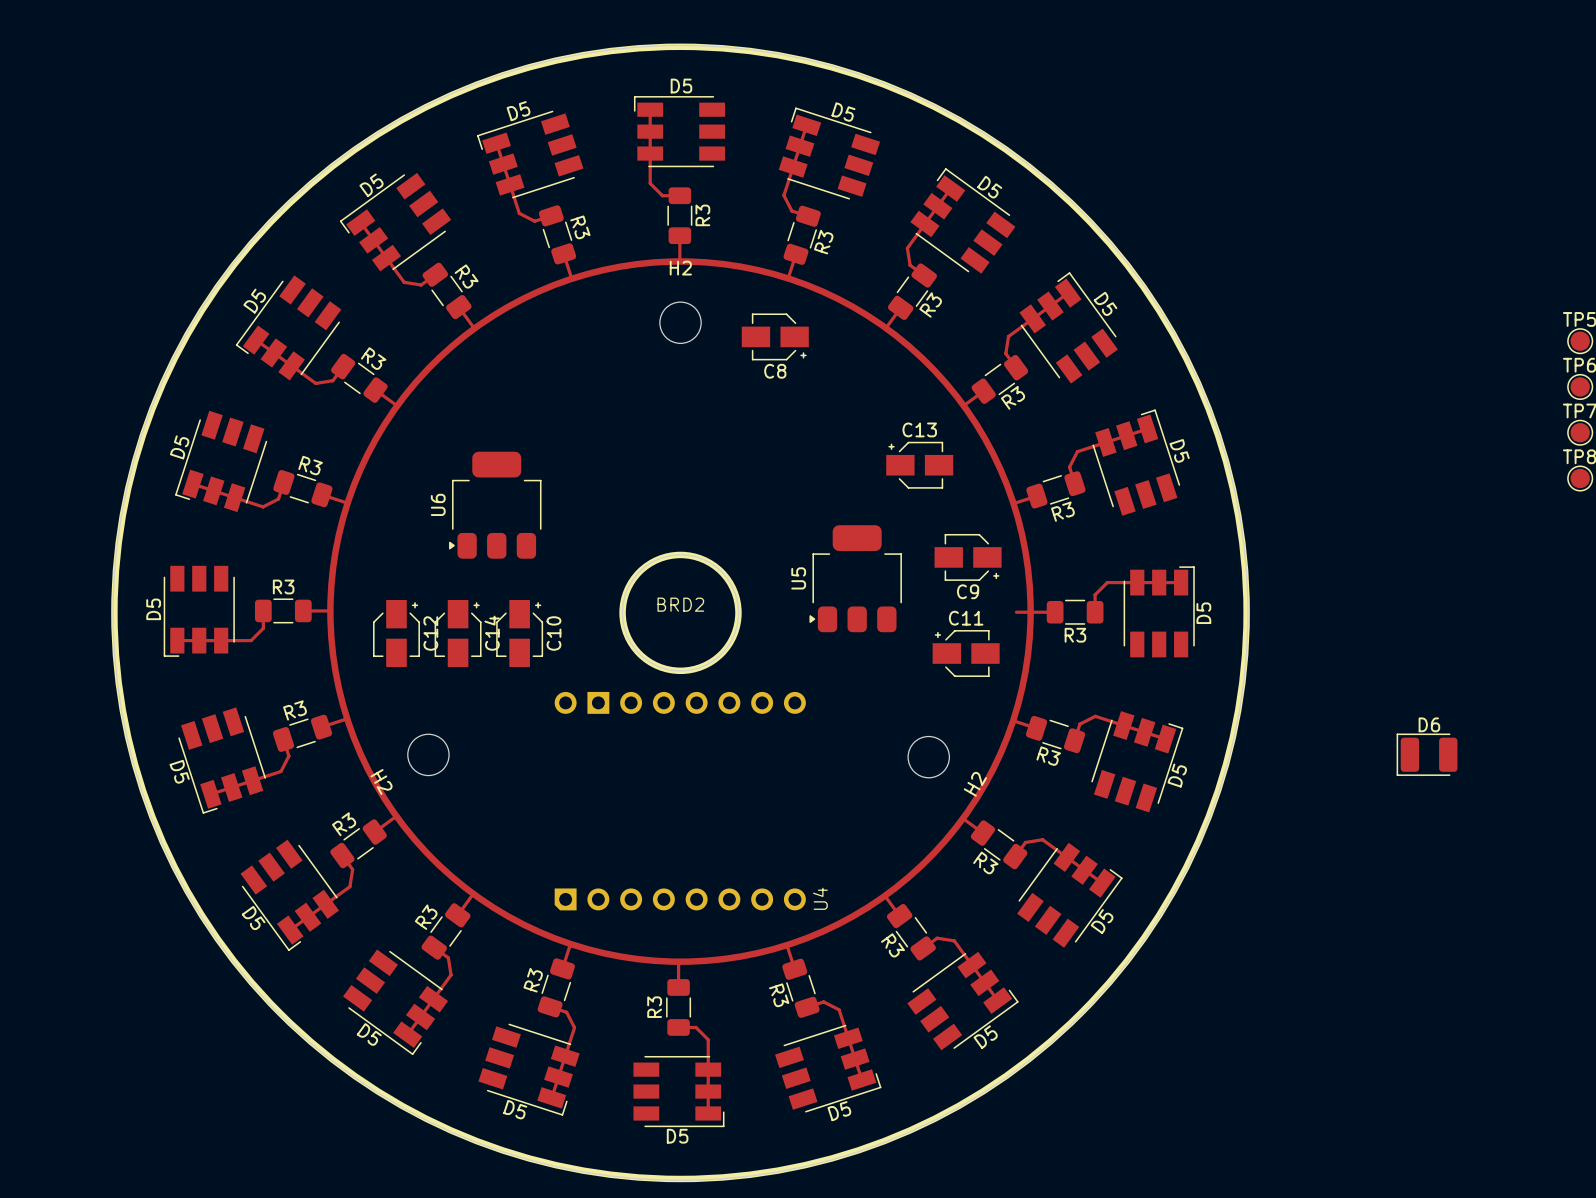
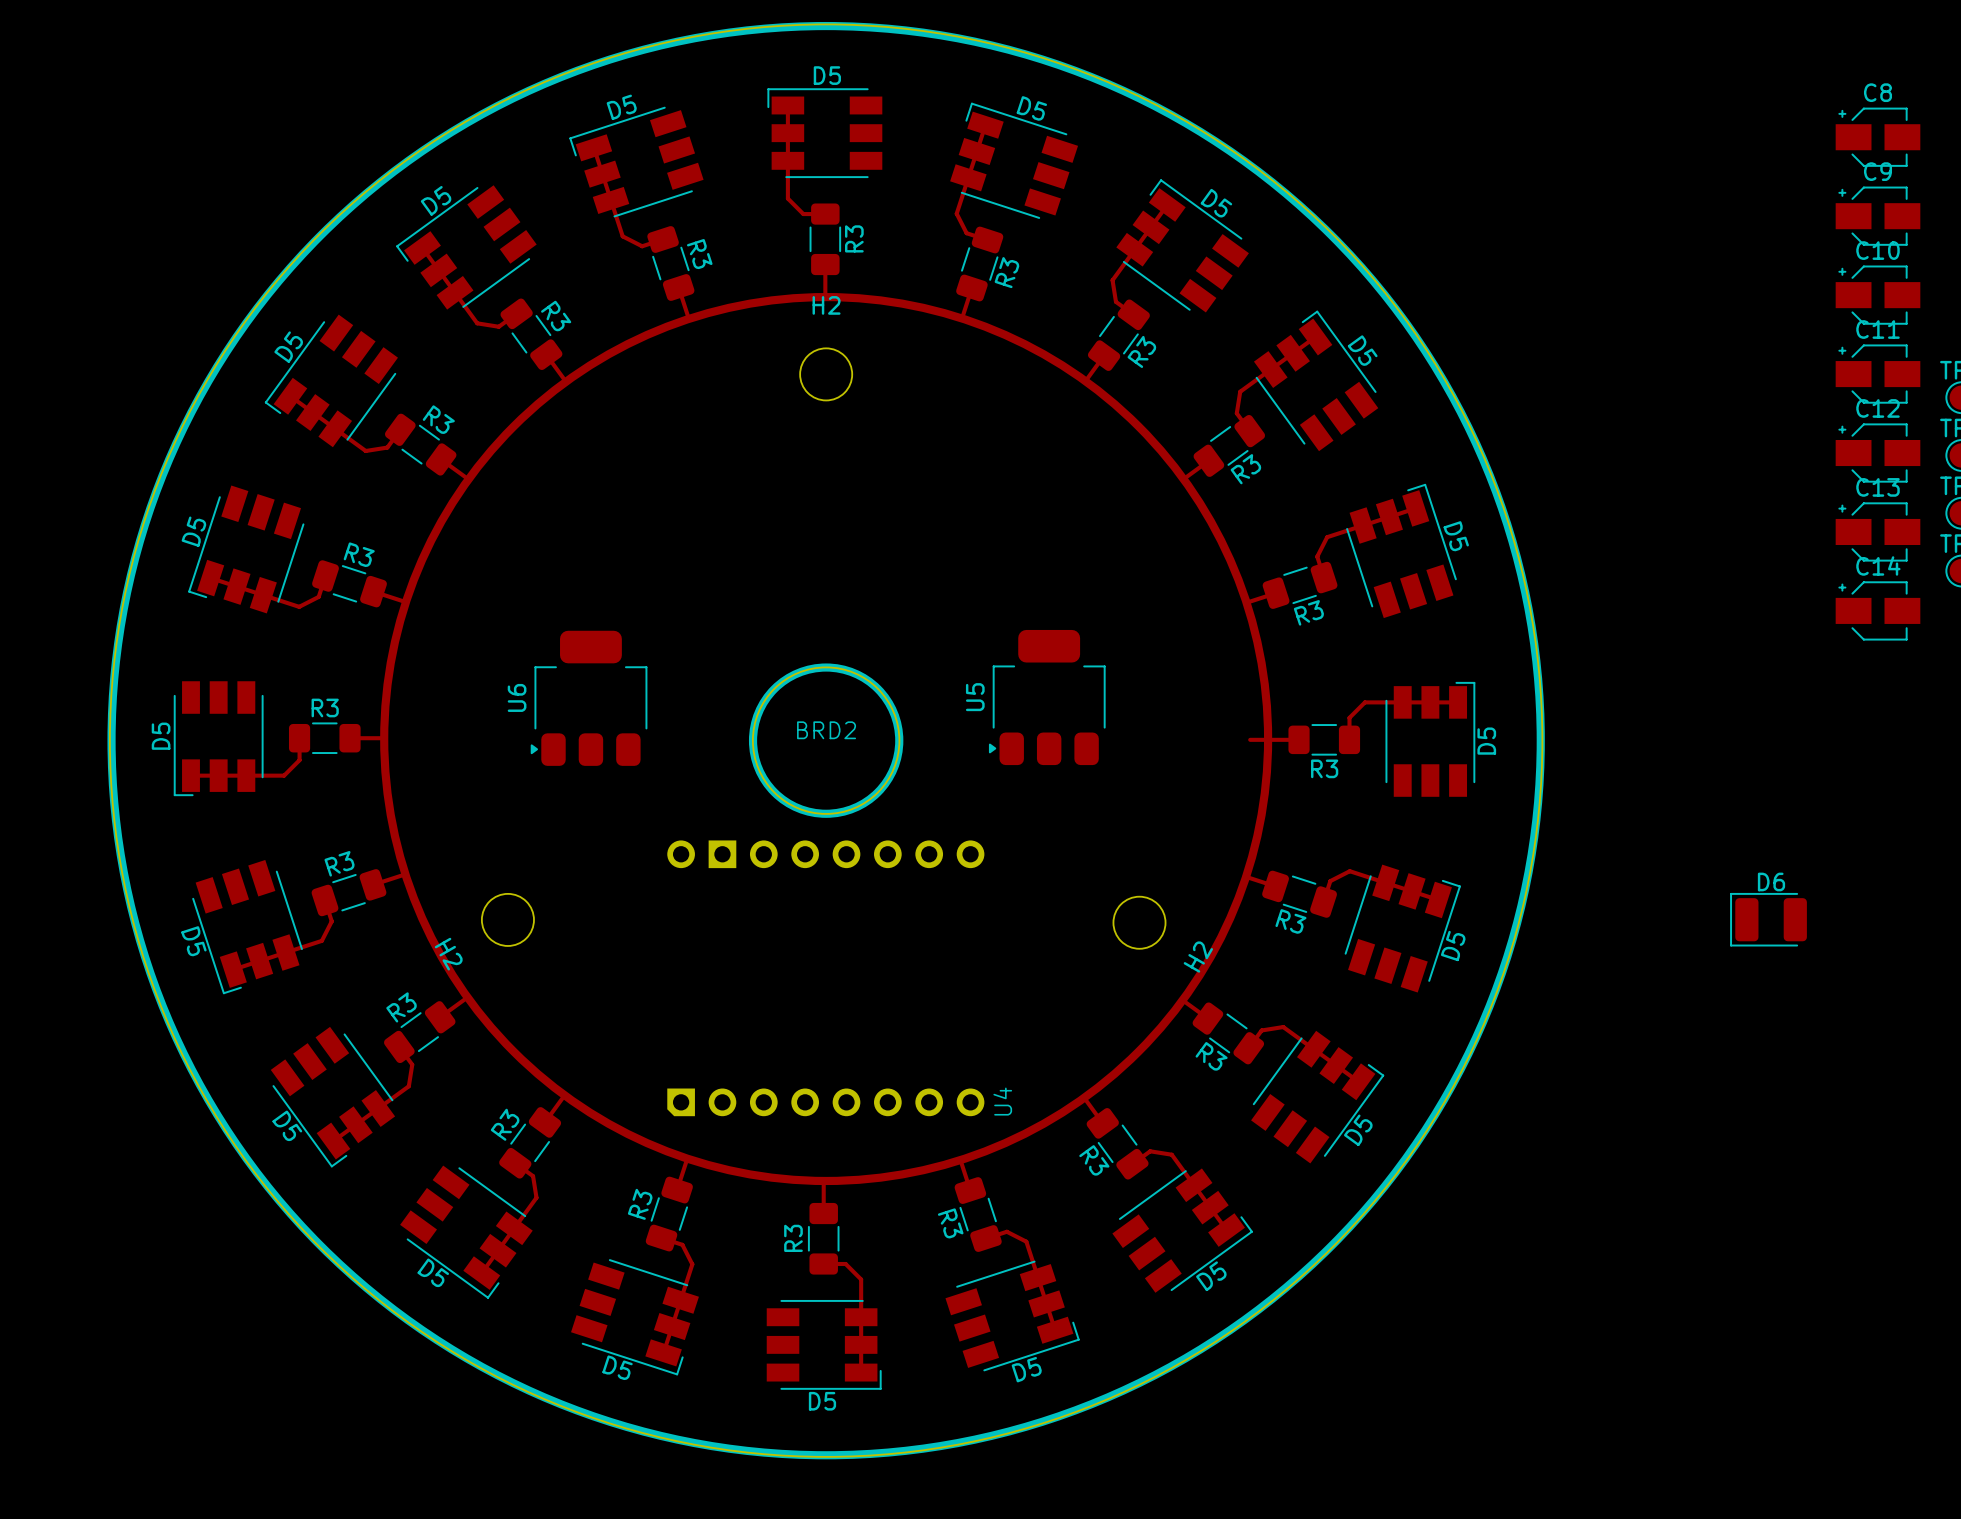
C8 rotation: 0° (775, 336) -> 180° (1878, 137)
C8 position: (775, 336) -> (1878, 137)
C13 position: (919, 465) -> (1878, 531)
U6 position: (495, 505) -> (589, 698)
C9 rotation: 0° (968, 557) -> 180° (1878, 216)
C9 position: (968, 557) -> (1878, 216)
C12 rotation: 0° (396, 633) -> 90° counterclockwise (1878, 453)
C12 position: (396, 633) -> (1878, 453)
C14 rotation: 0° (458, 633) -> 90° counterclockwise (1878, 610)
C14 position: (458, 633) -> (1878, 610)
C10 rotation: 0° (519, 633) -> 90° counterclockwise (1878, 295)
C10 position: (519, 633) -> (1878, 295)
C11 position: (966, 653) -> (1878, 374)

